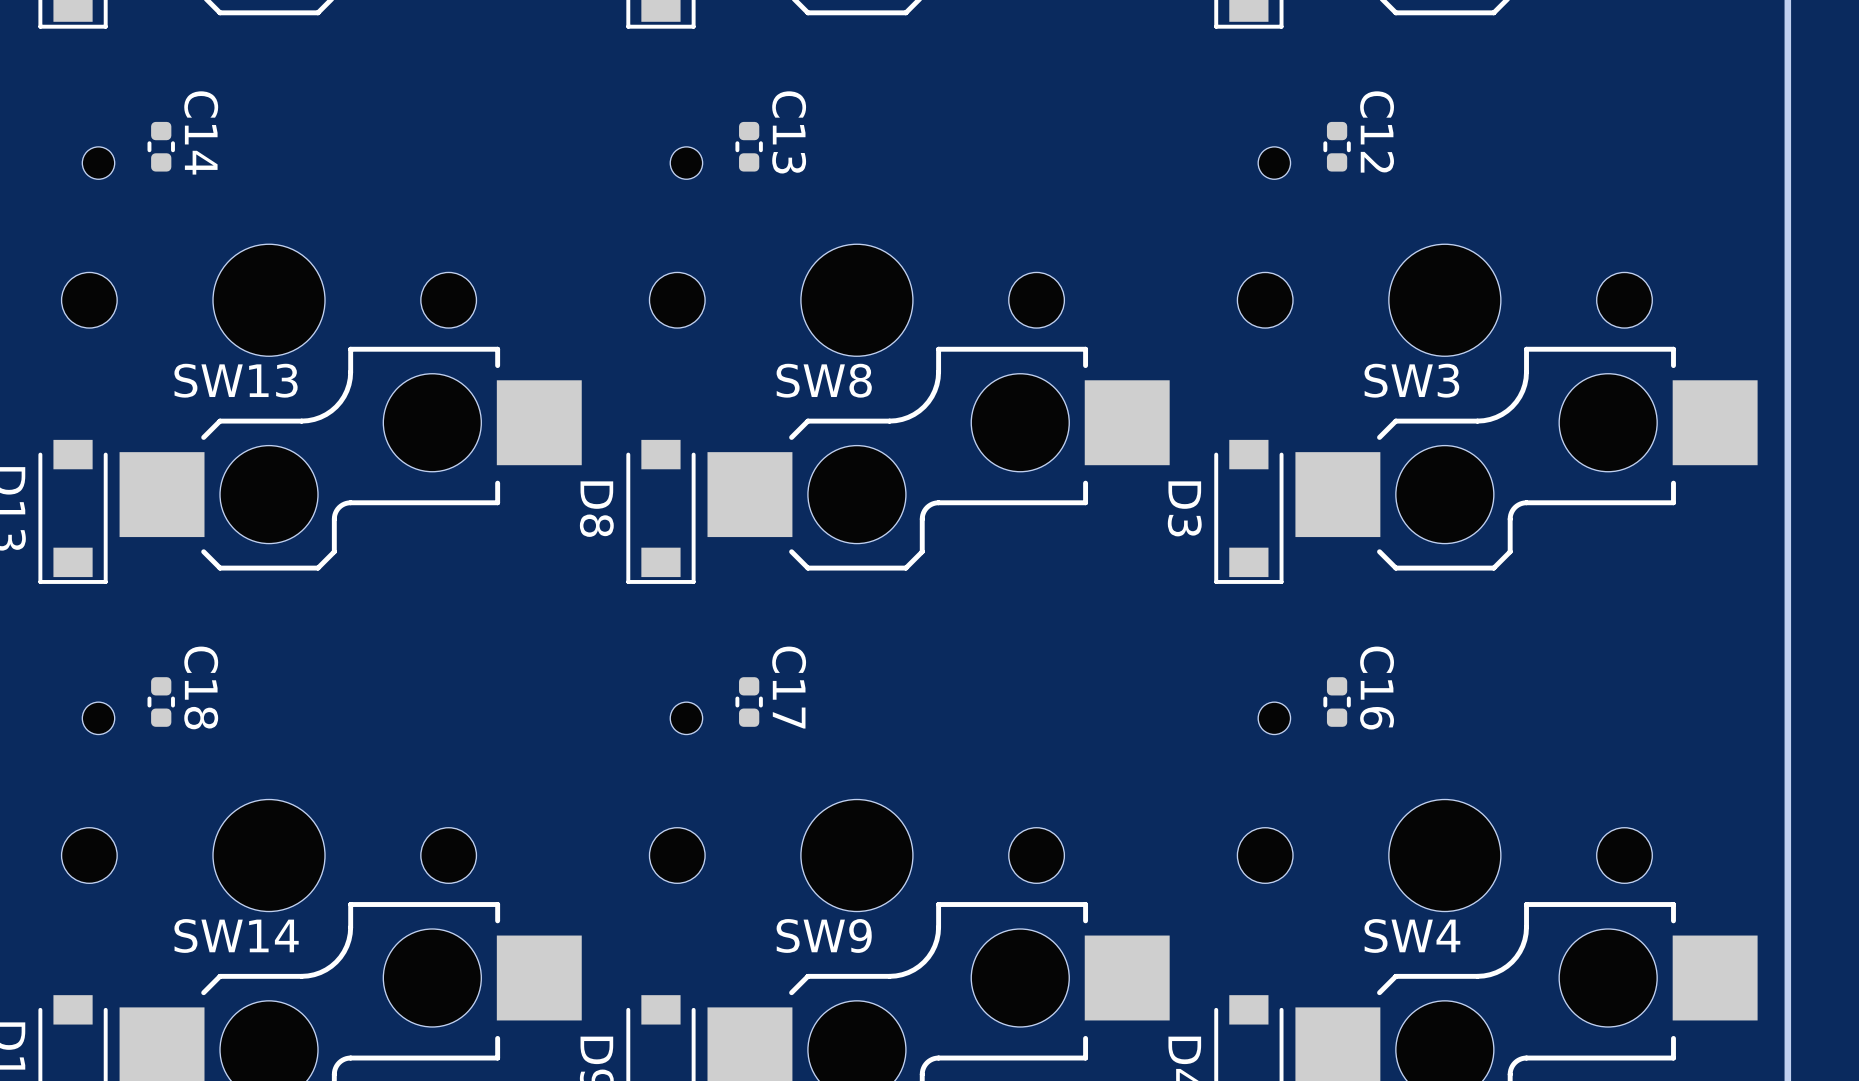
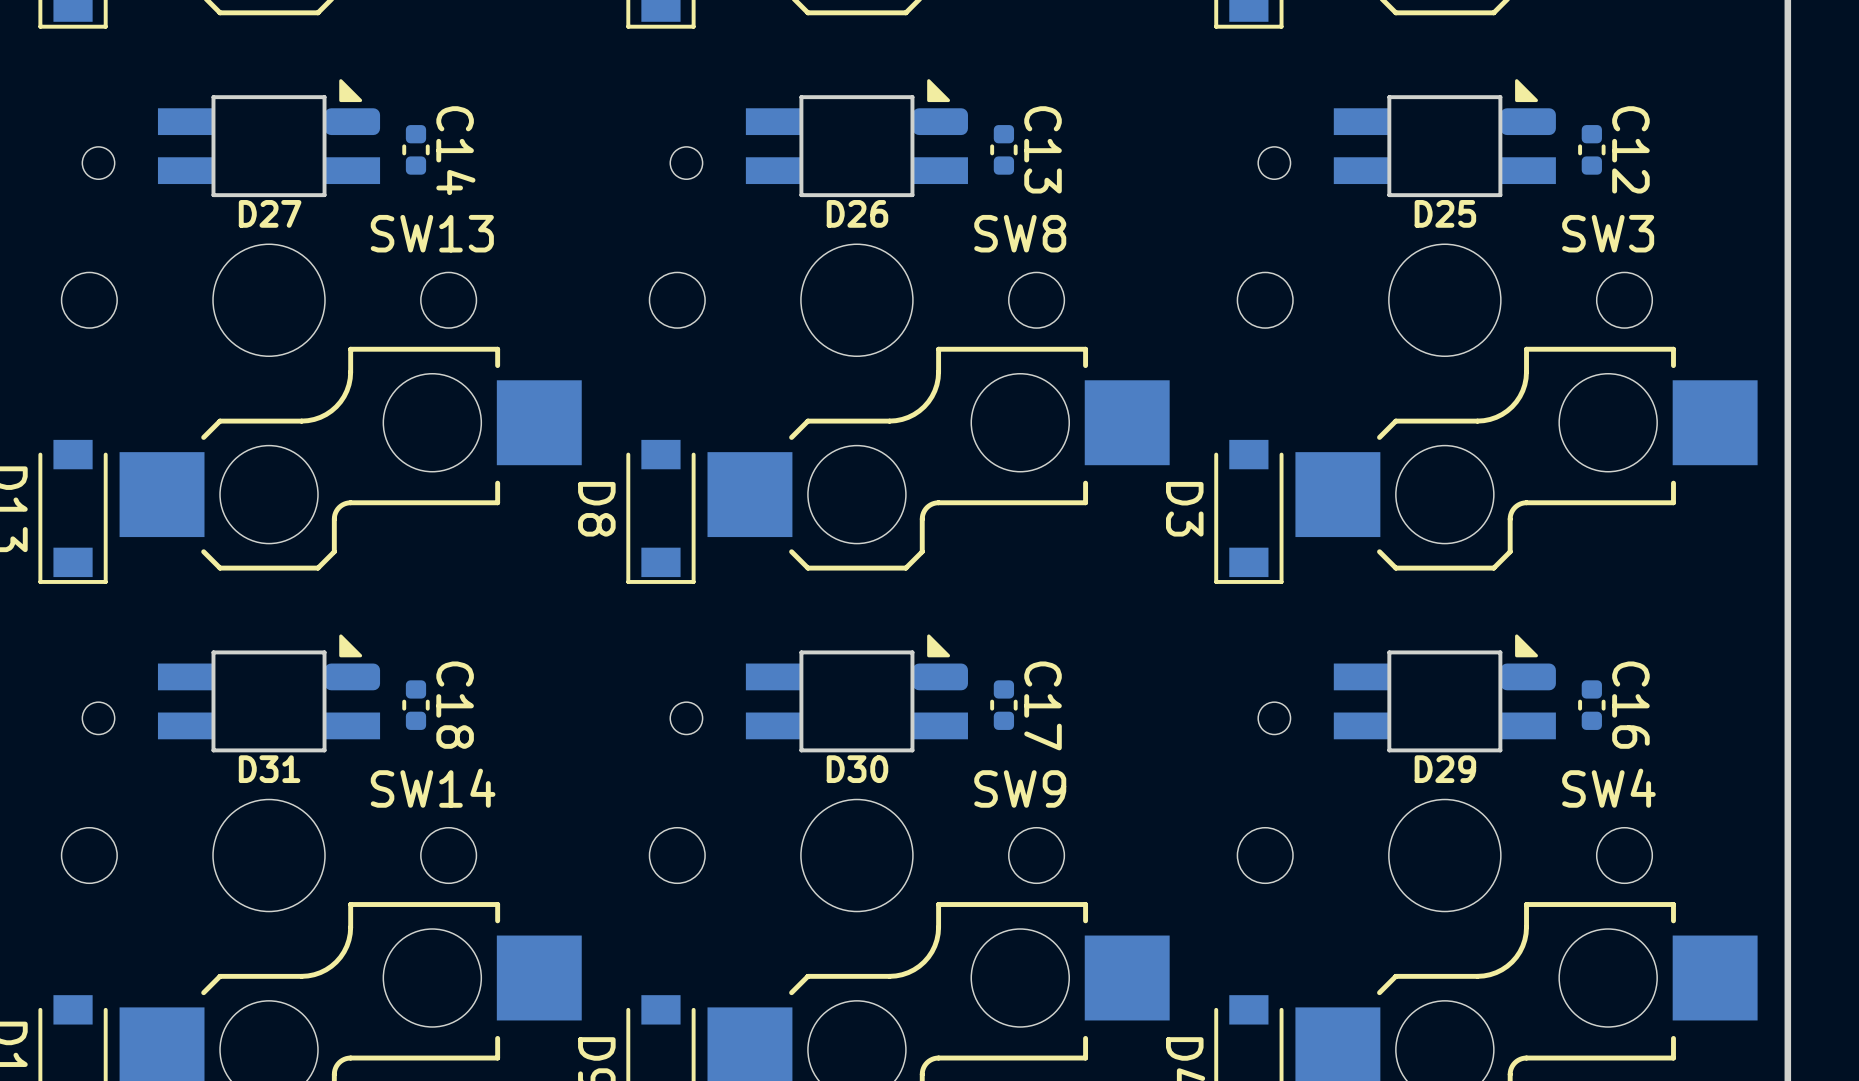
C12 name position: C12 (1377, 131) -> C12 (1630, 149)
C14 name position: C14 (201, 132) -> C14 (455, 150)
C13 name position: C13 (789, 132) -> C13 (1043, 149)
D27: none -> (269, 138)
D26: none -> (856, 138)
D25: none -> (1444, 138)
C14 position: (161, 146) -> (415, 149)
C13 position: (749, 146) -> (1003, 149)
C12 position: (1337, 146) -> (1591, 149)
SW13 name position: SW13 (236, 380) -> SW13 (432, 233)
SW8 name position: SW8 (824, 380) -> SW8 (1020, 233)
SW3 name position: SW3 (1411, 380) -> SW3 (1608, 233)
C18 name position: C18 (201, 687) -> C18 (455, 705)
C17 name position: C17 (789, 687) -> C17 (1043, 705)
C16 name position: C16 (1377, 688) -> C16 (1630, 705)
D31: none -> (269, 693)
D30: none -> (856, 693)
D29: none -> (1444, 693)
C18 position: (161, 702) -> (415, 705)
C17 position: (749, 702) -> (1003, 705)
C16 position: (1337, 702) -> (1591, 705)
SW14 name position: SW14 (236, 935) -> SW14 (433, 788)
SW9 name position: SW9 (824, 935) -> SW9 (1020, 788)
SW4 name position: SW4 (1412, 935) -> SW4 (1608, 788)

